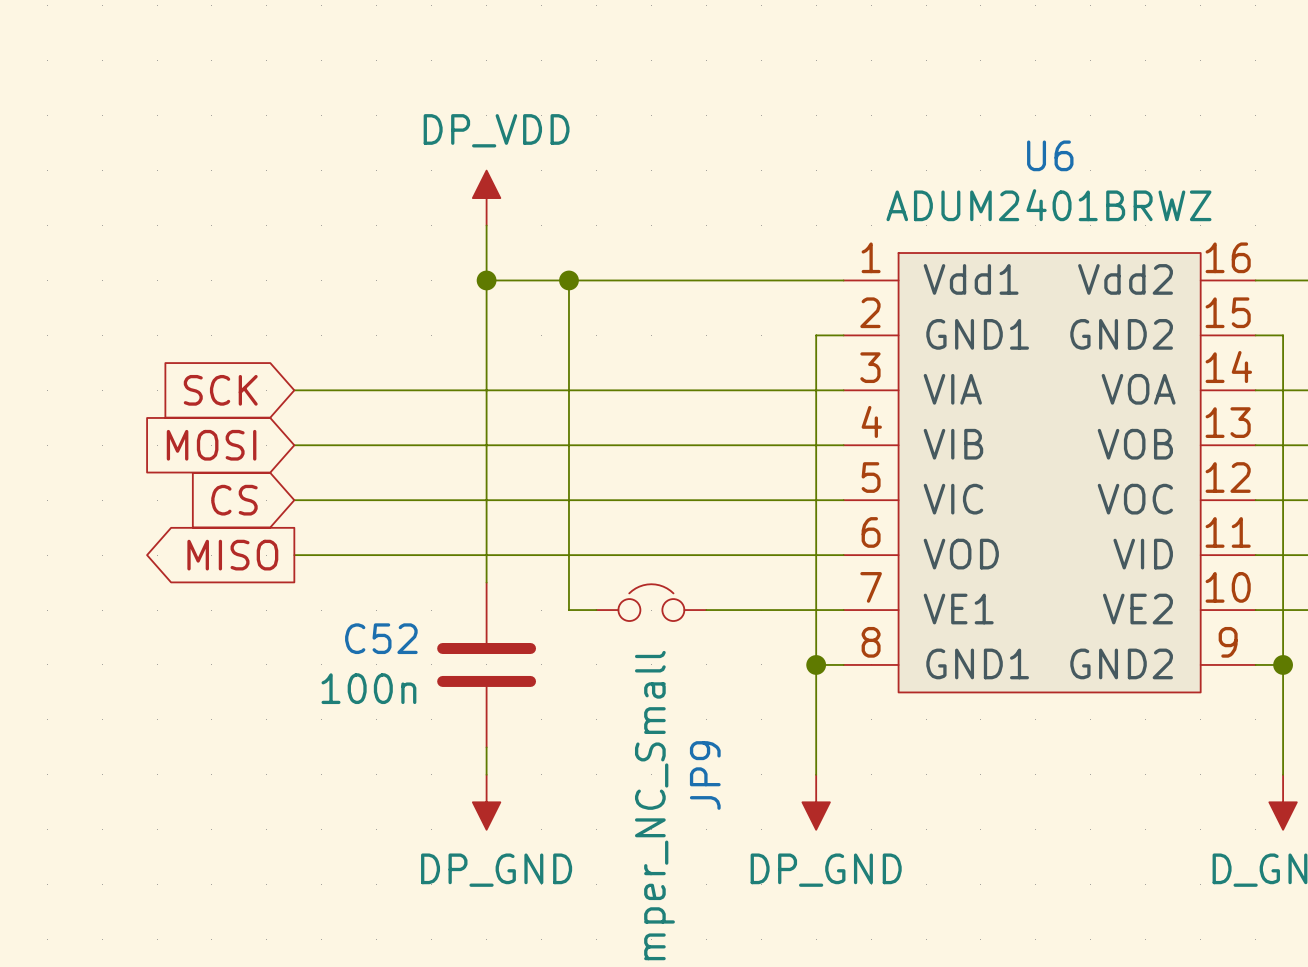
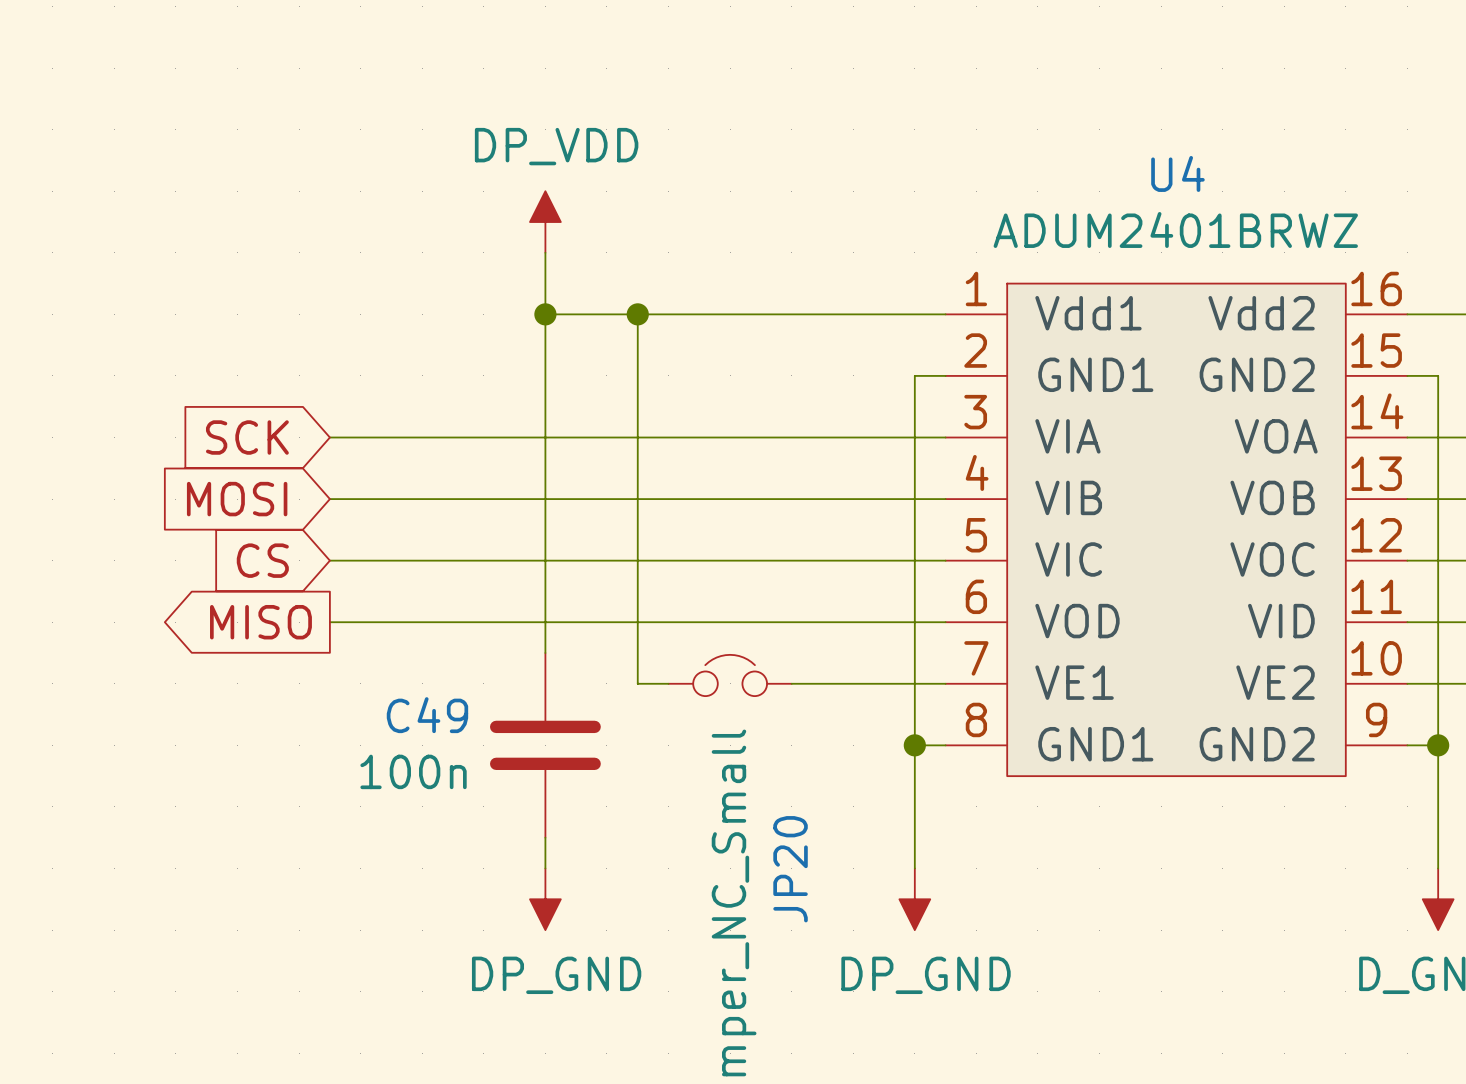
U6 name: U6 (1050, 155) -> U4 (1177, 173)
C52 name: C52 (381, 638) -> C49 (427, 715)
JP9 name: JP9 (705, 775) -> JP20 (790, 869)

